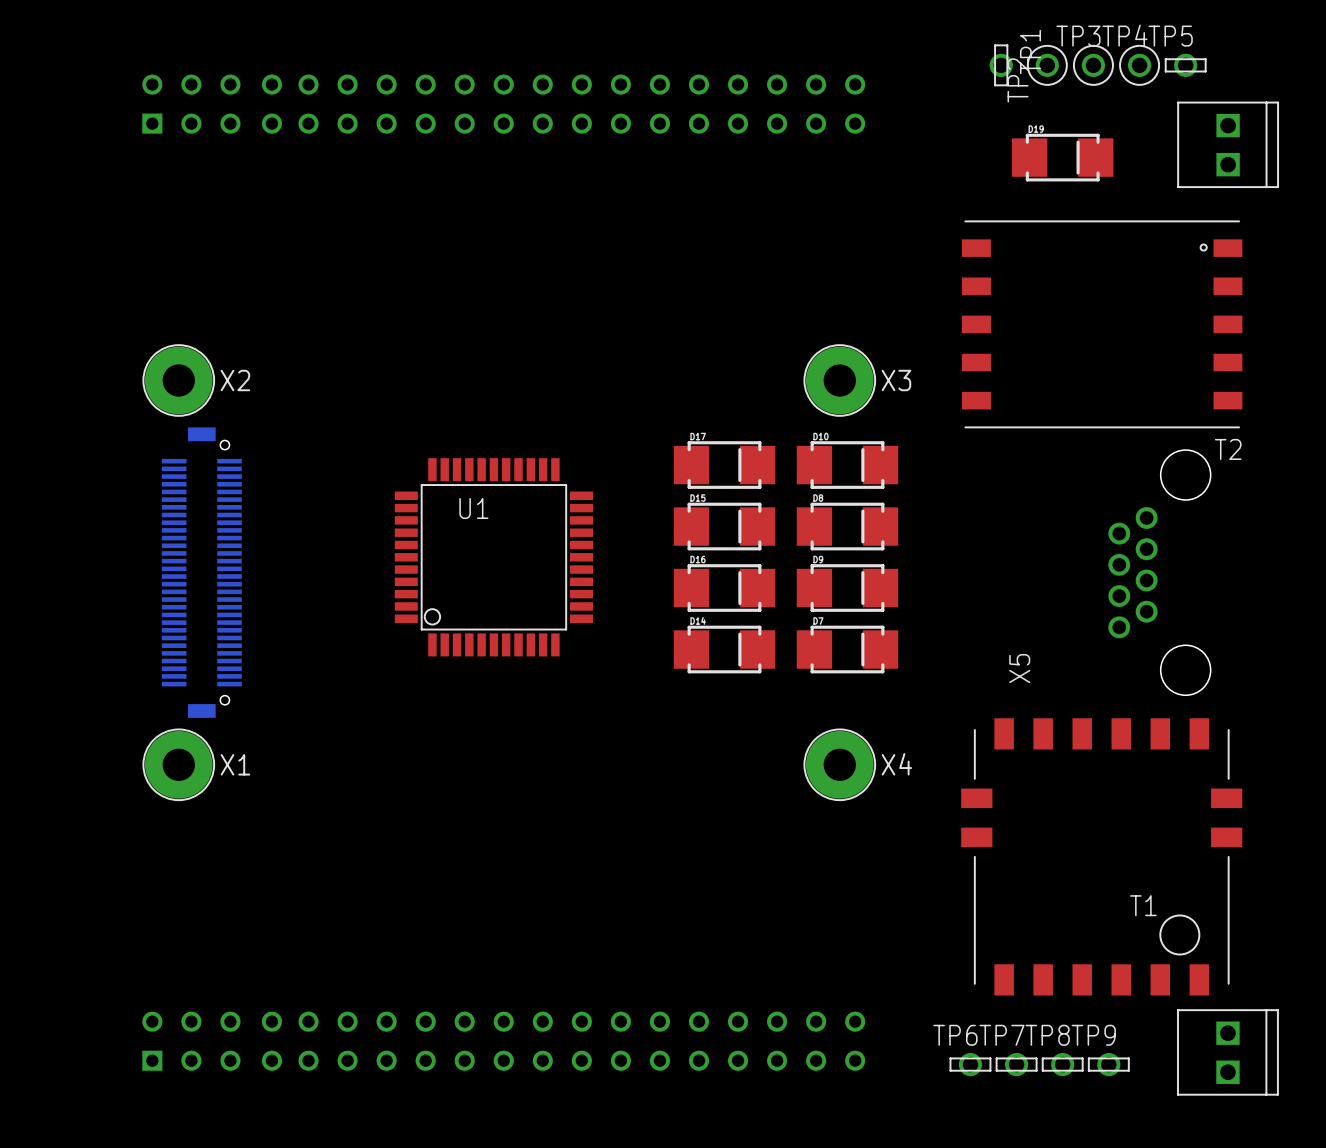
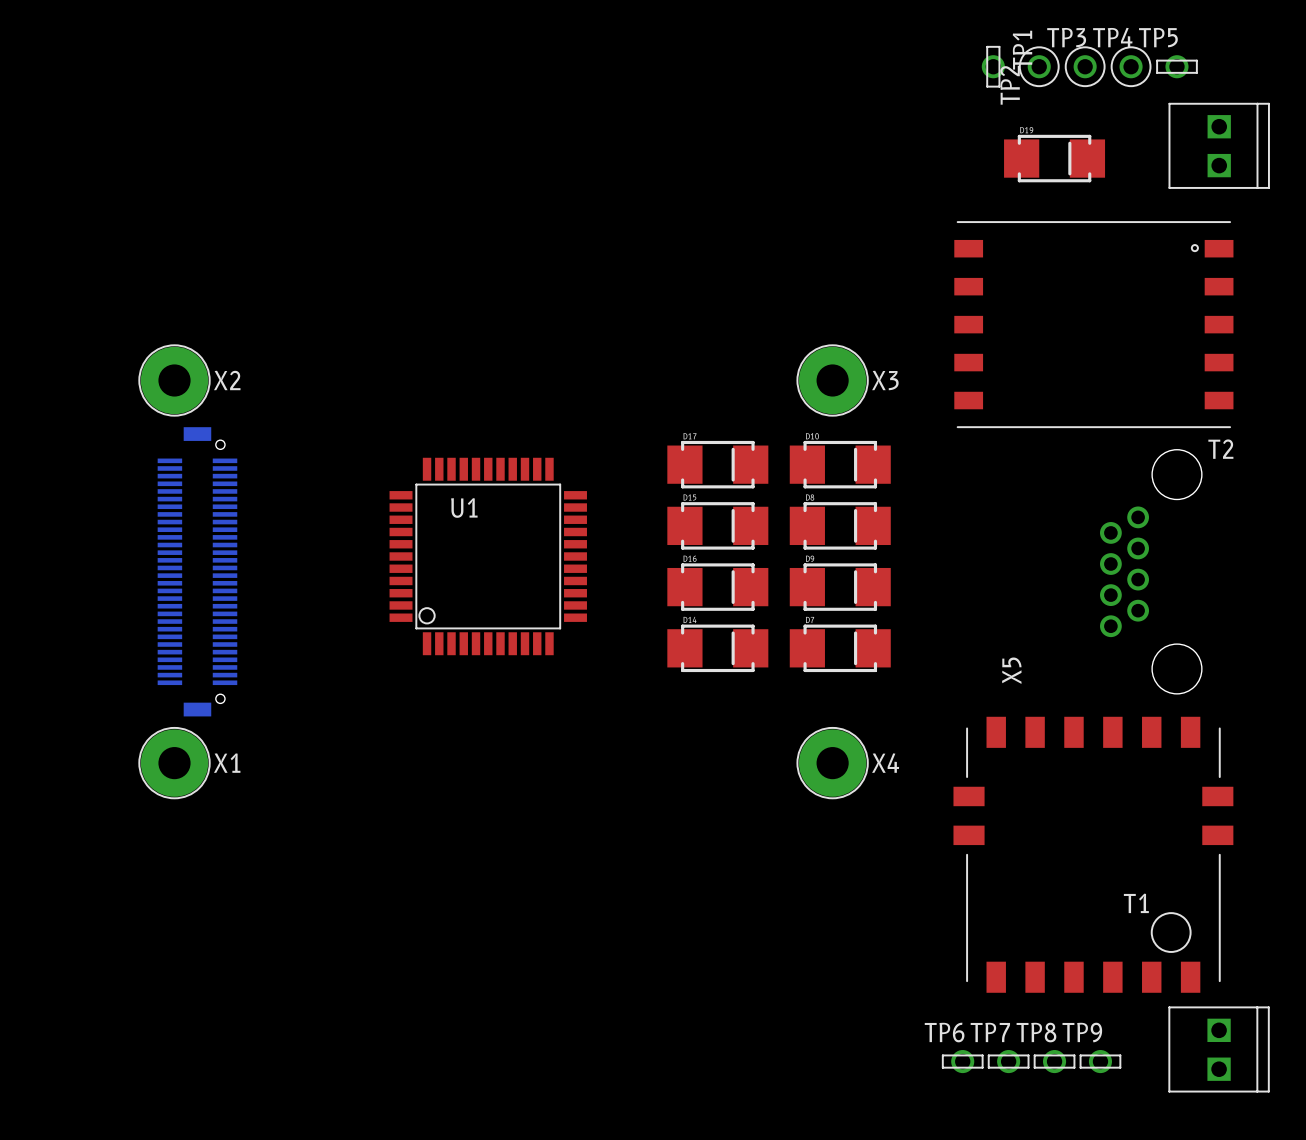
part: (503, 104) -> none
part: (503, 1041) -> none

